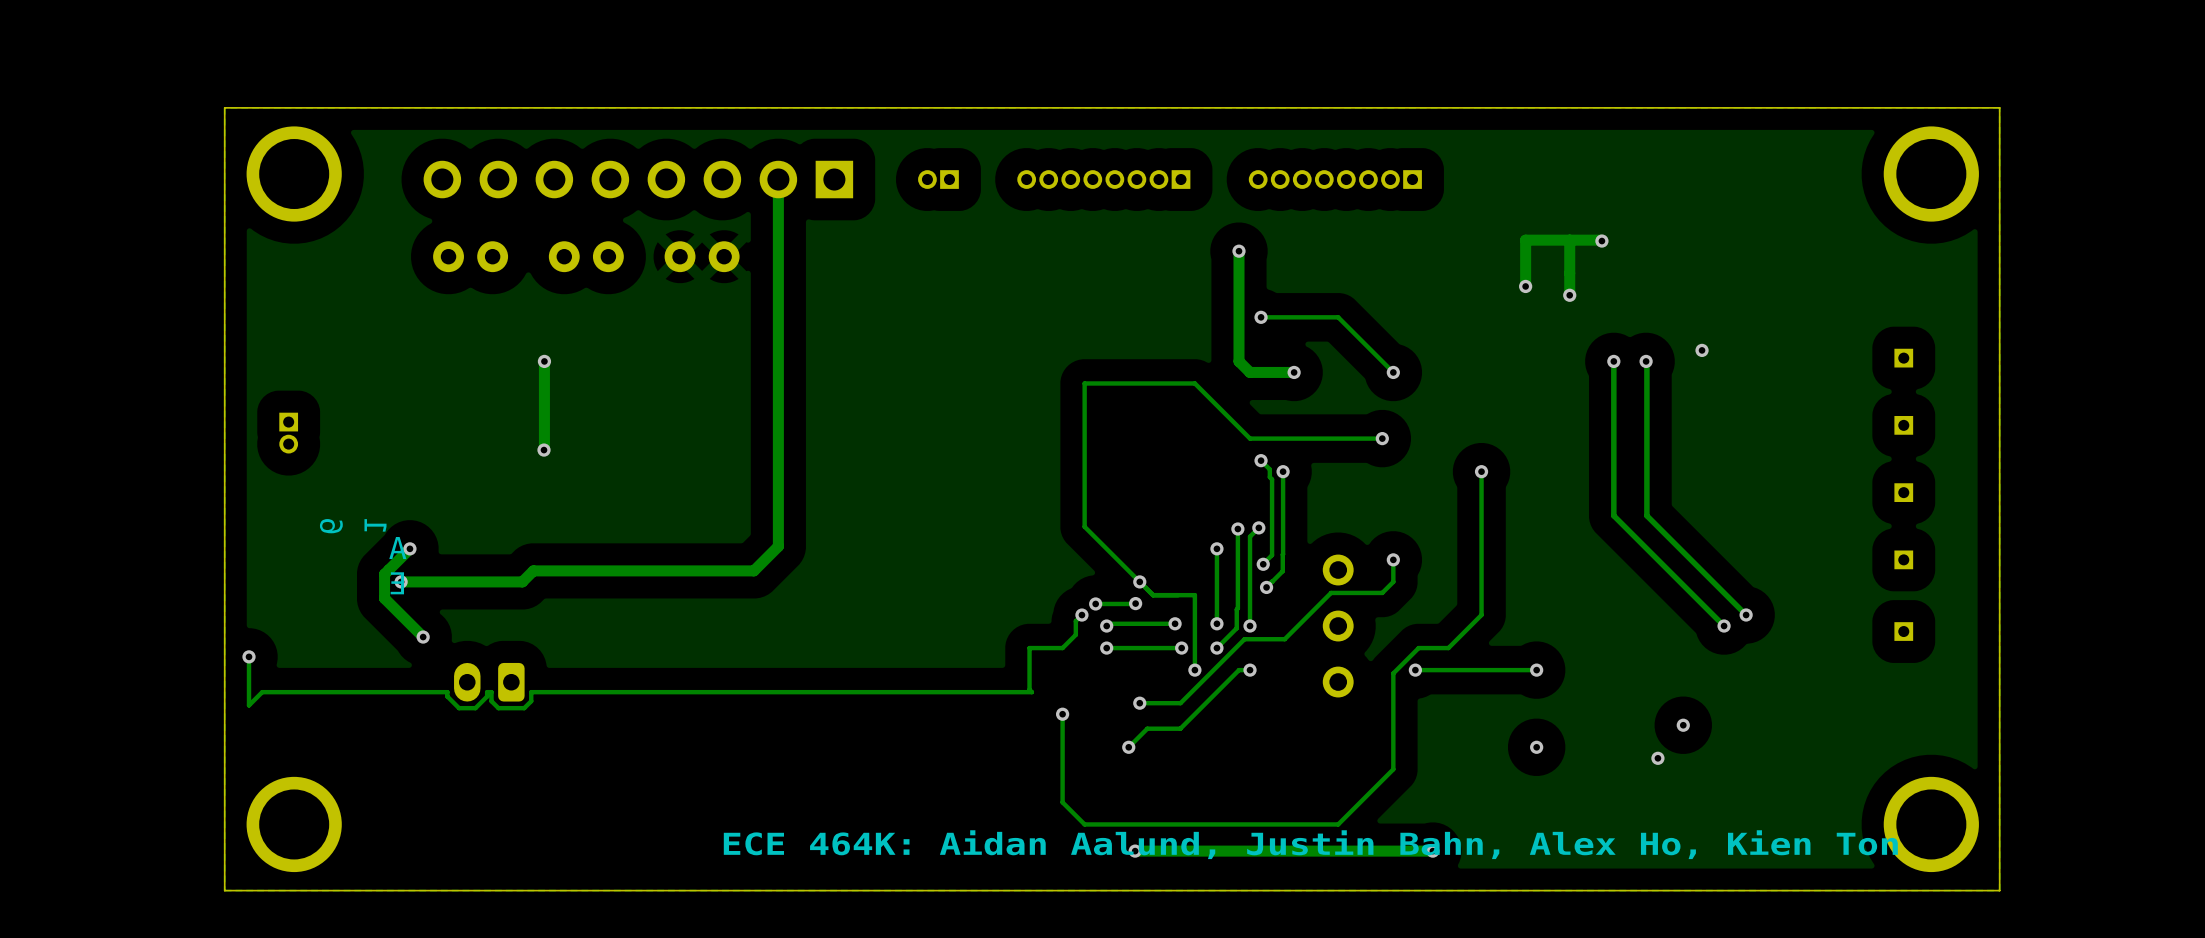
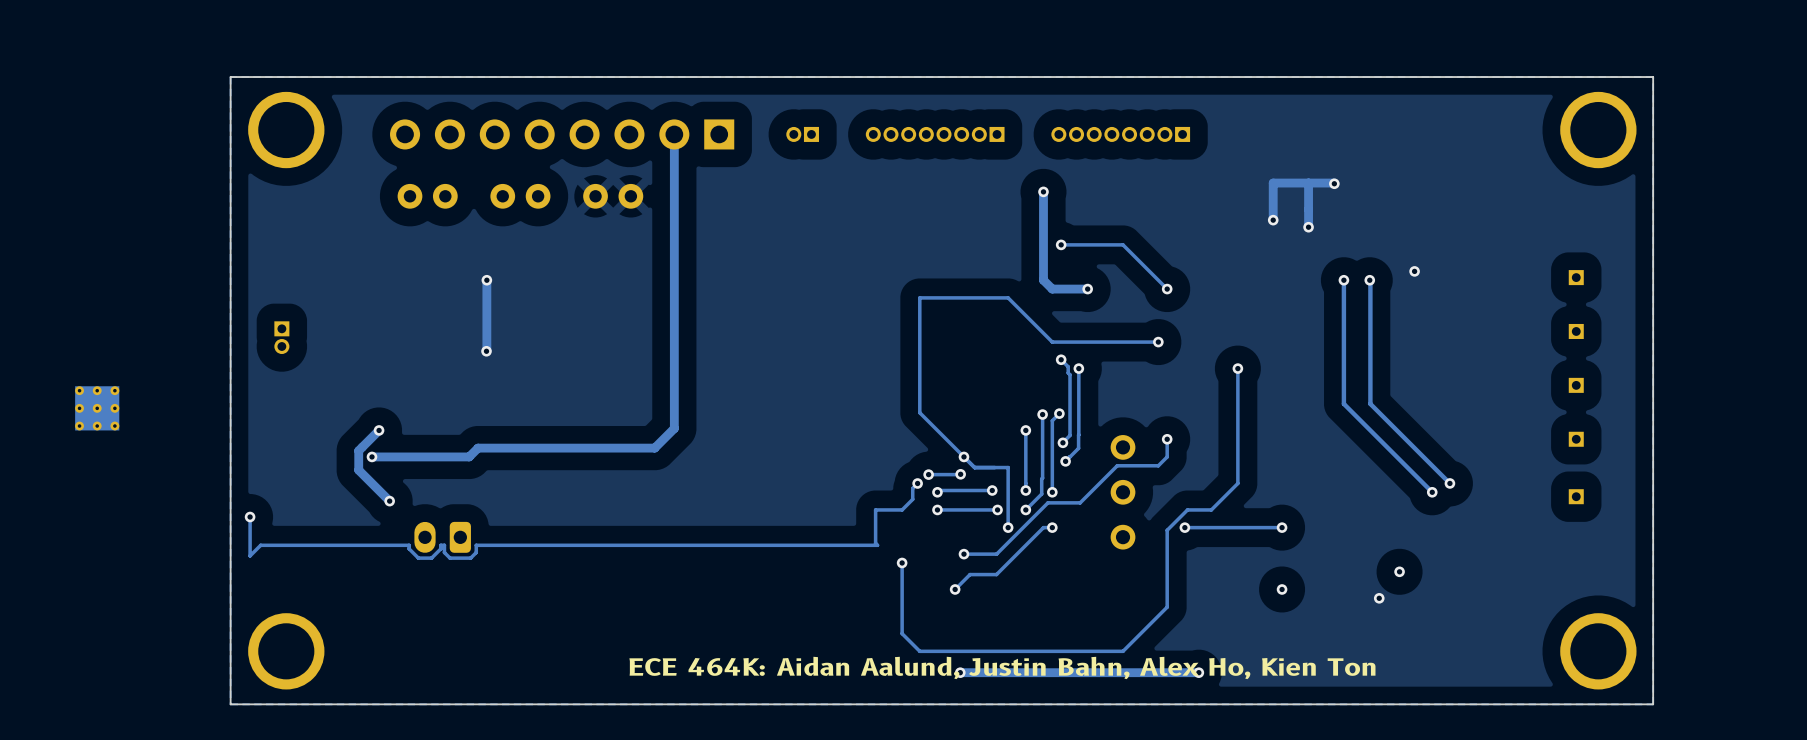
part: none -> (97, 408)
part: (363, 556) -> none

